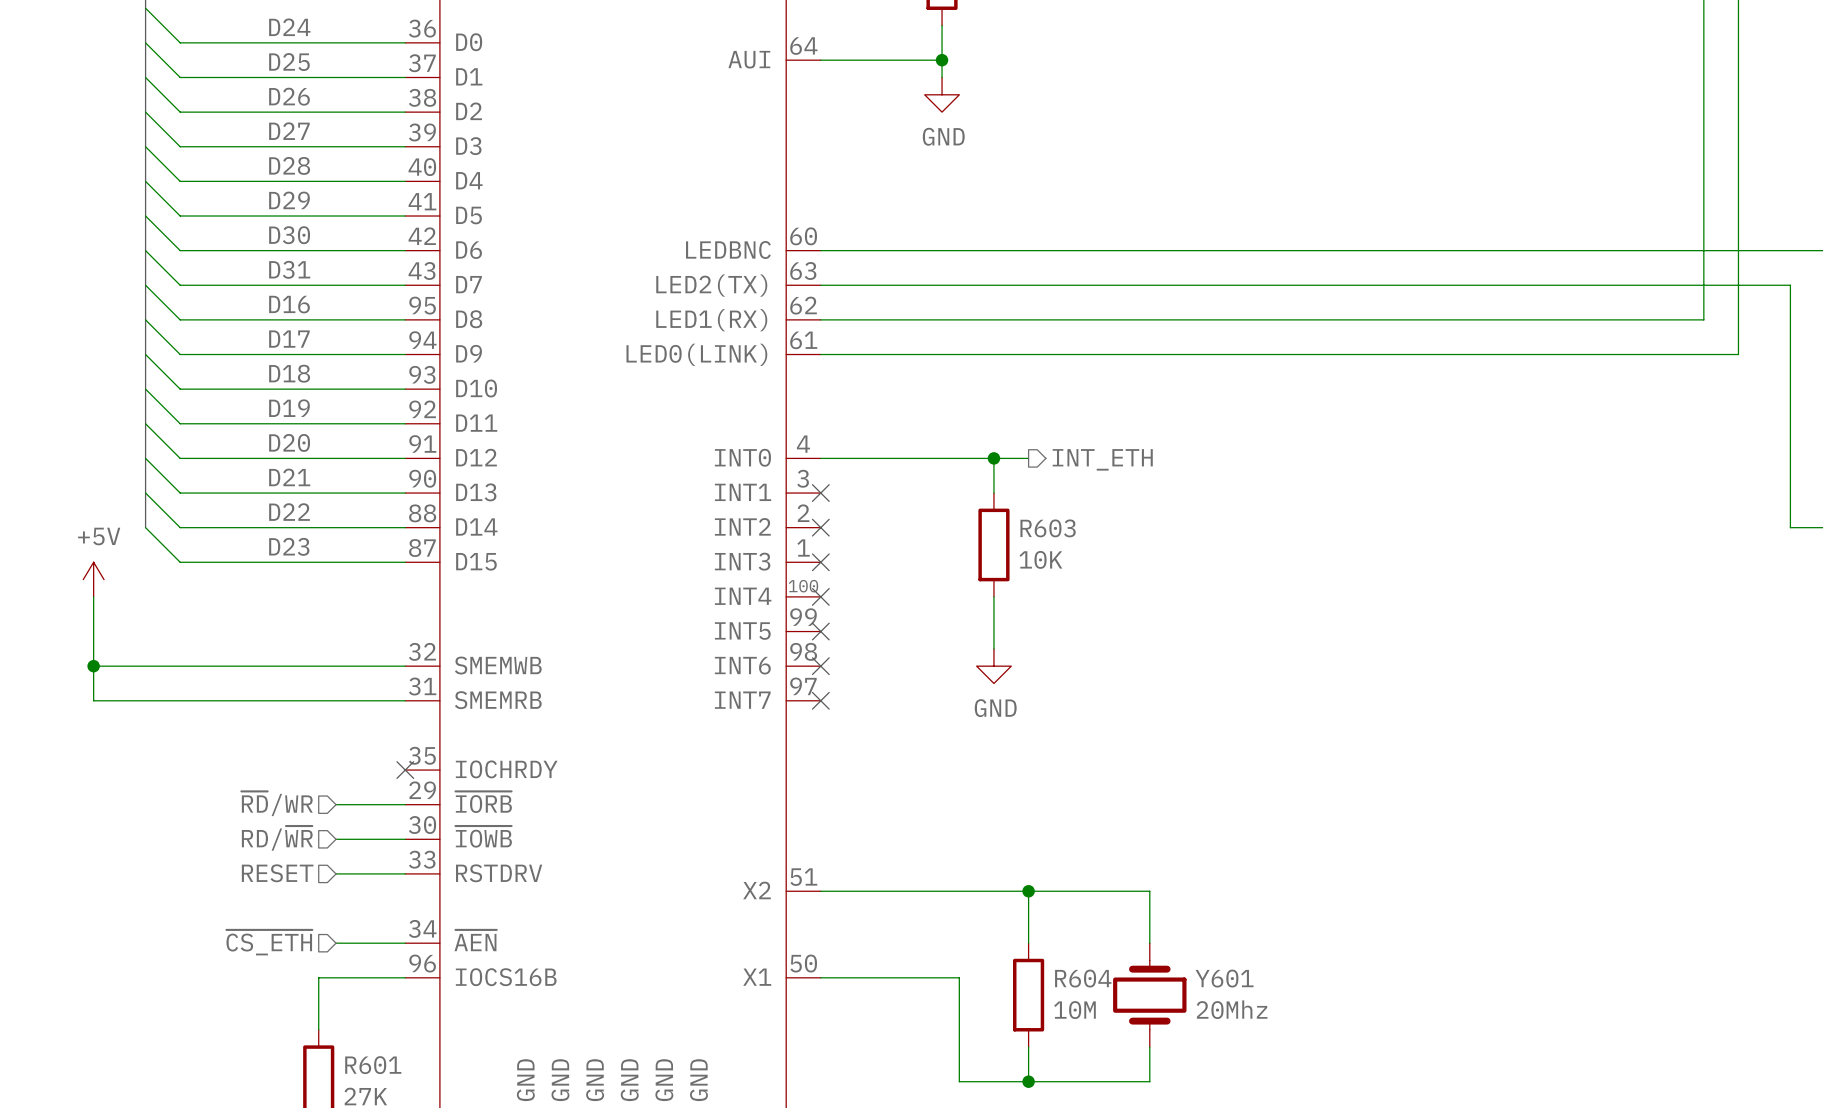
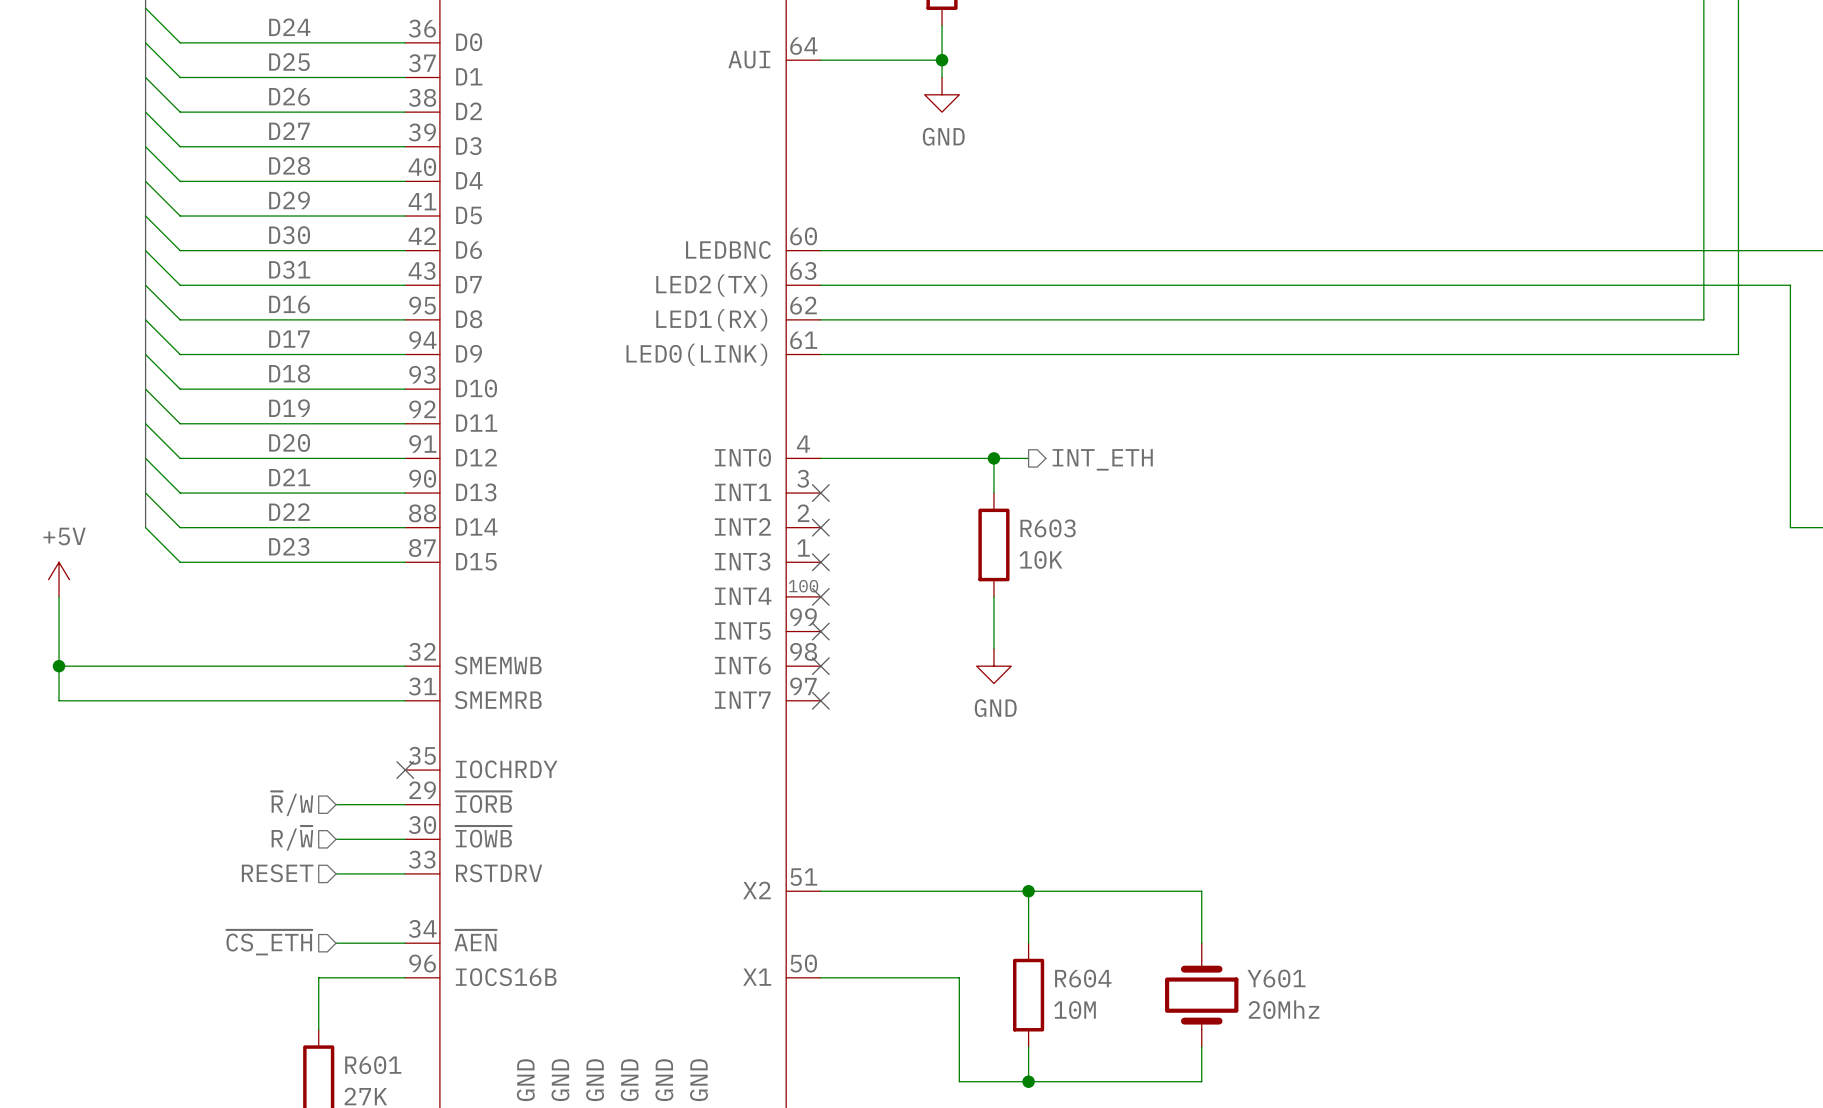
power symbol position: +5V (93, 579) -> +5V (59, 579)
wire: (93, 596) (93, 700) -> (59, 596) (59, 700) (93, 700)
wire: none -> (59, 666) (93, 666)
junction position: (93, 666) -> (59, 666)
hierarchical label: ~{RD}/WR (277, 803) -> ~{R}/W (292, 803)
hierarchical label: RD/~{WR} (277, 838) -> R/~{W} (292, 838)
wire: (1149, 891) (1149, 943) -> (1149, 891) (1201, 891) (1201, 943)
Y601 position: (1149, 995) -> (1201, 995)
wire: (1149, 1047) (1149, 1081) -> (1201, 1047) (1201, 1081) (1149, 1081)

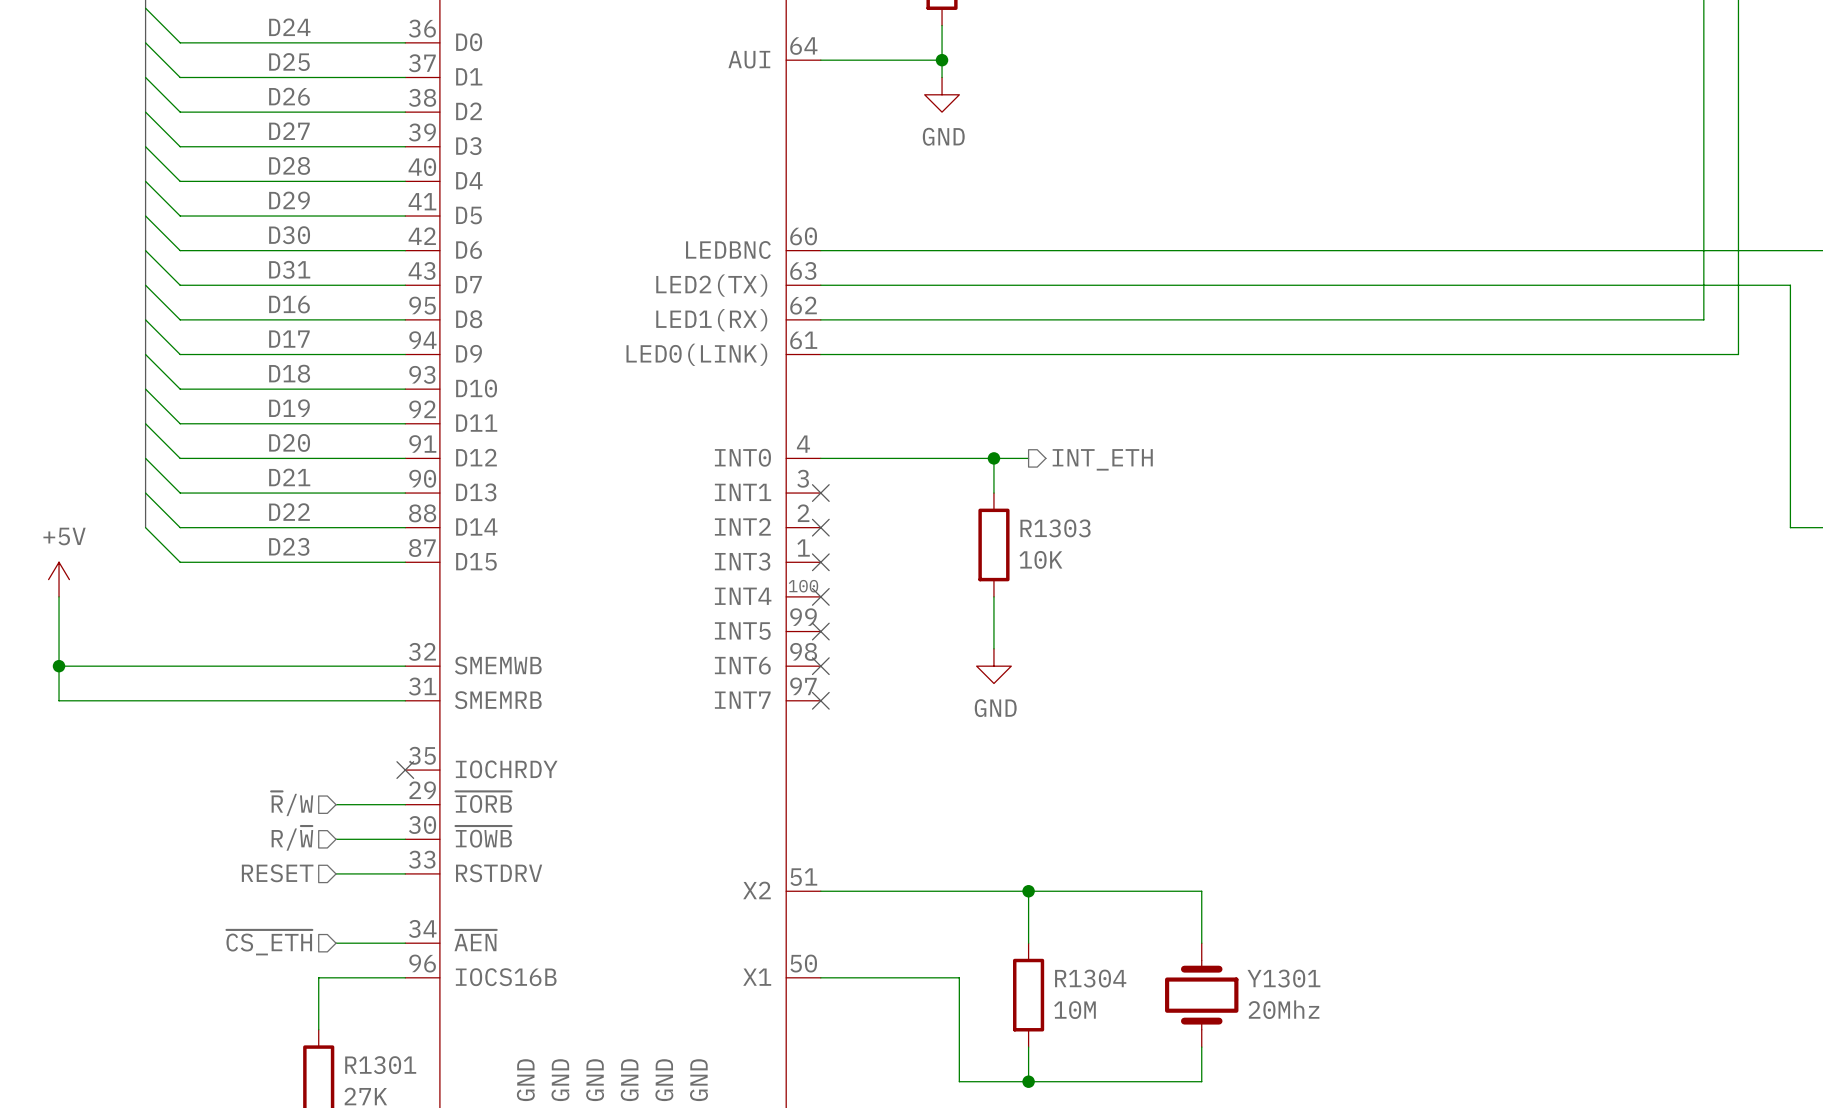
R603 name: R603 (1048, 528) -> R1303 (1055, 528)
R604 name: R604 (1083, 978) -> R1304 (1090, 978)
Y601 name: Y601 (1276, 978) -> Y1301 (1283, 978)
R601 name: R601 (373, 1065) -> R1301 (380, 1065)

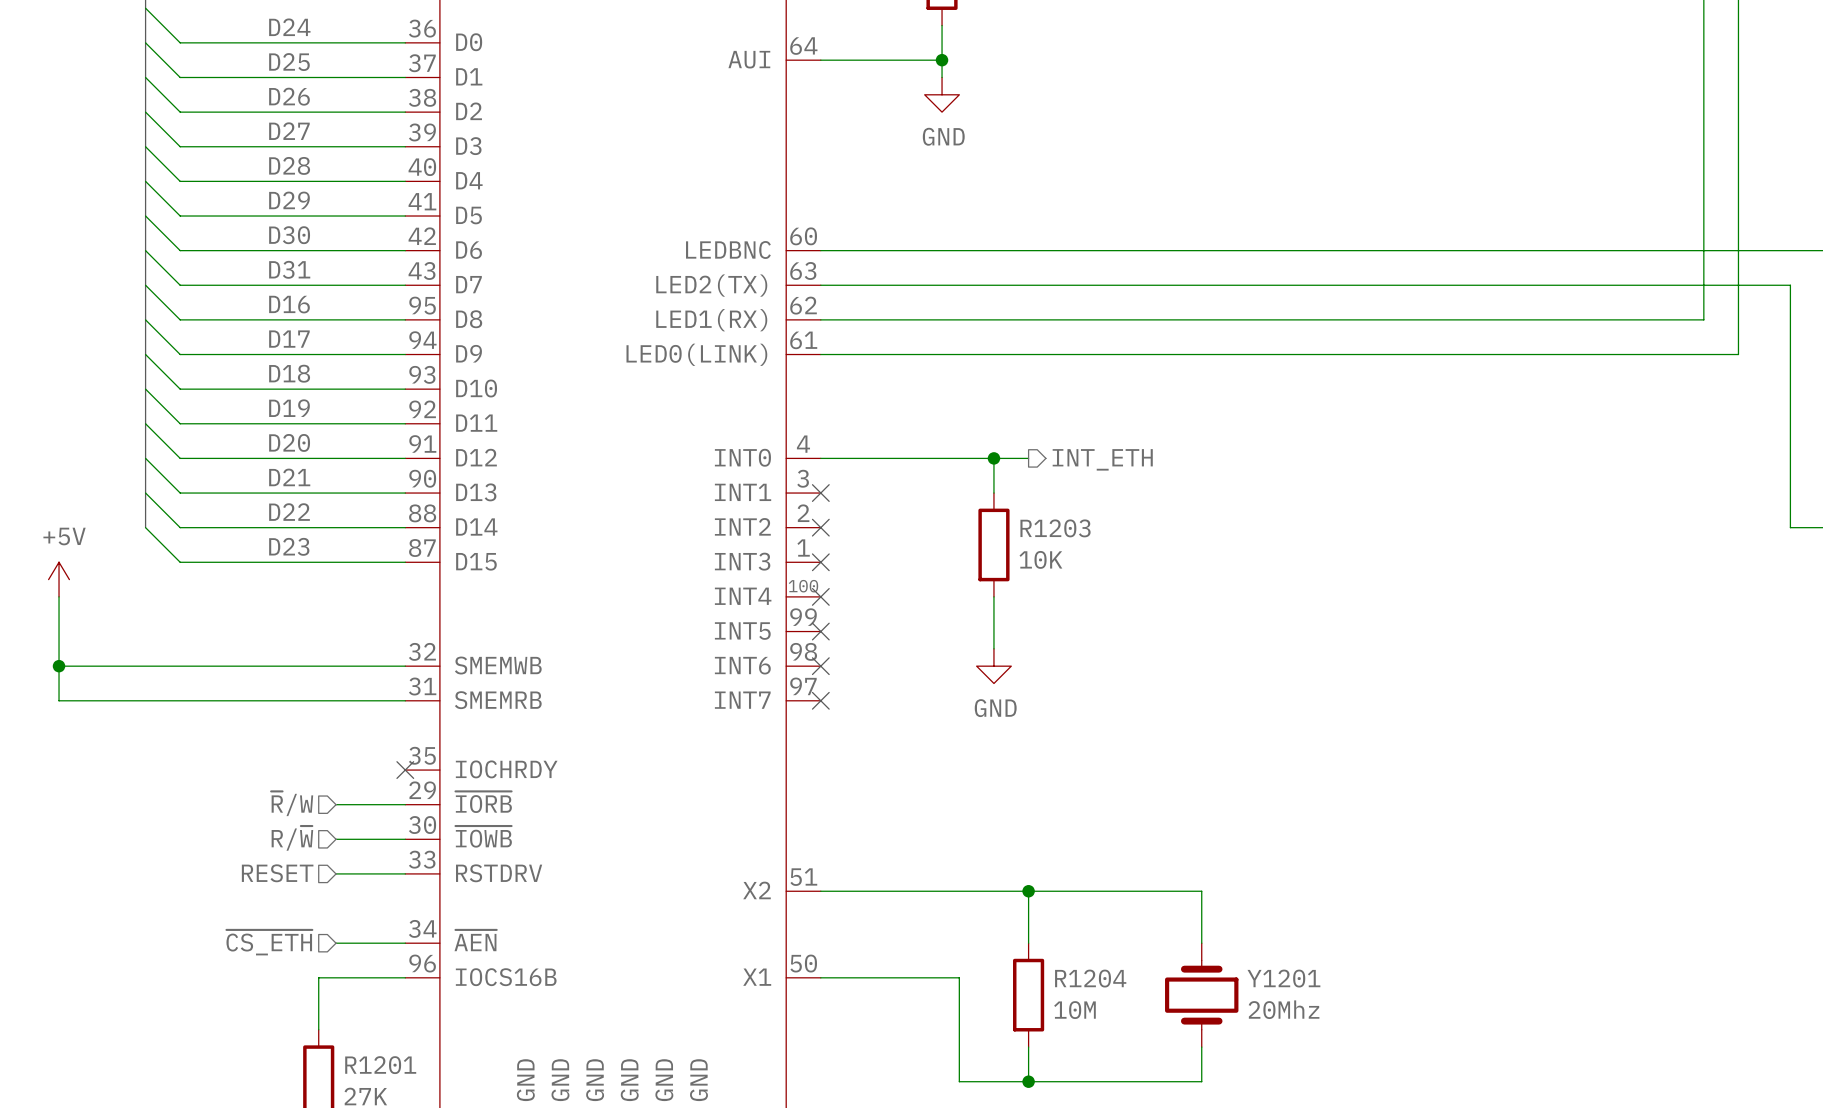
R1303 name: R1303 (1055, 528) -> R1203 (1055, 528)
R1304 name: R1304 (1090, 978) -> R1204 (1090, 978)
Y1301 name: Y1301 (1283, 978) -> Y1201 (1283, 978)
R1301 name: R1301 (380, 1065) -> R1201 (380, 1065)

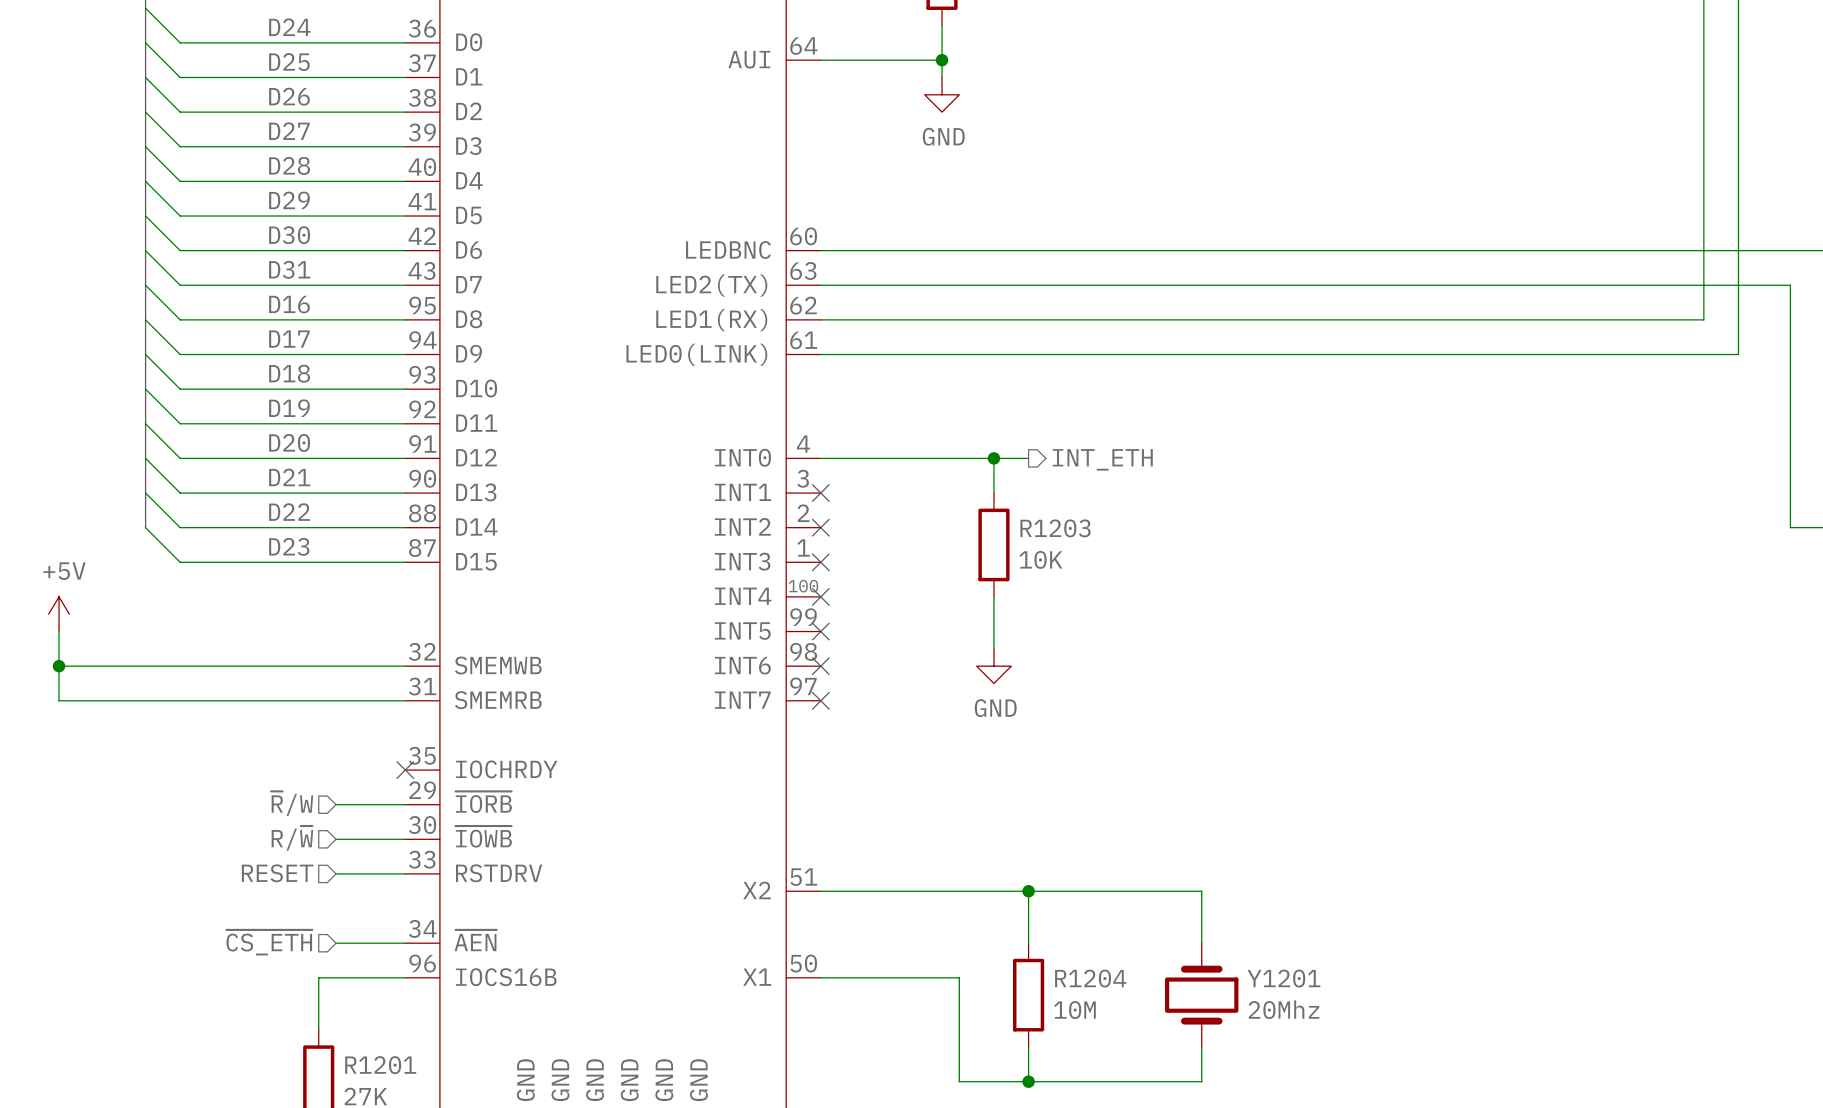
power symbol position: +5V (59, 579) -> +5V (59, 614)

